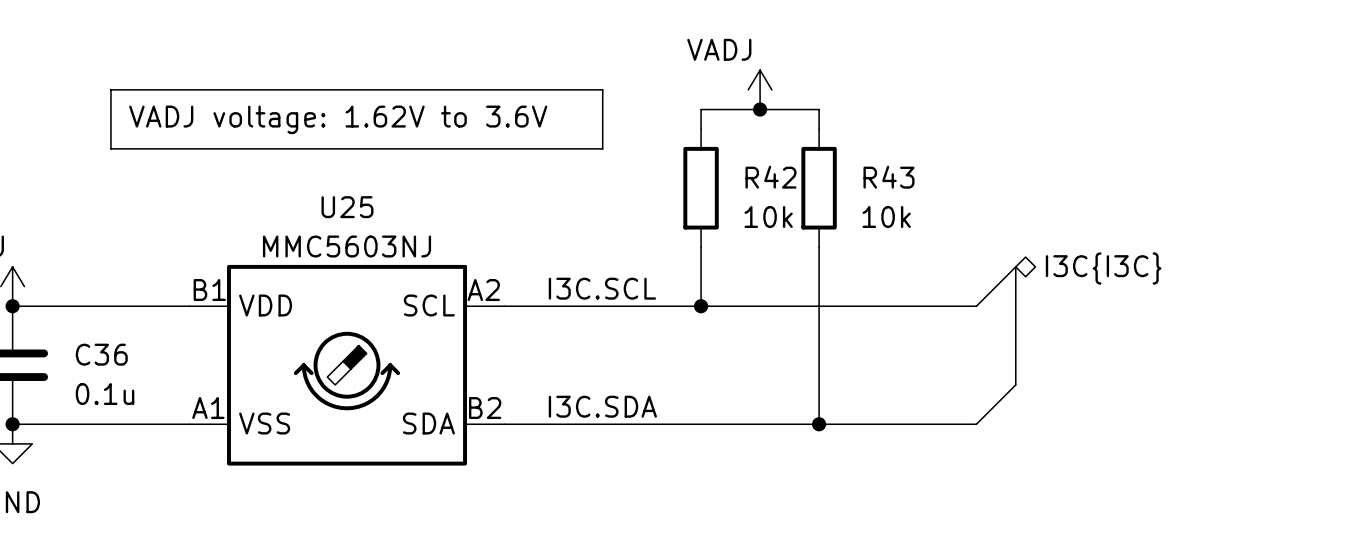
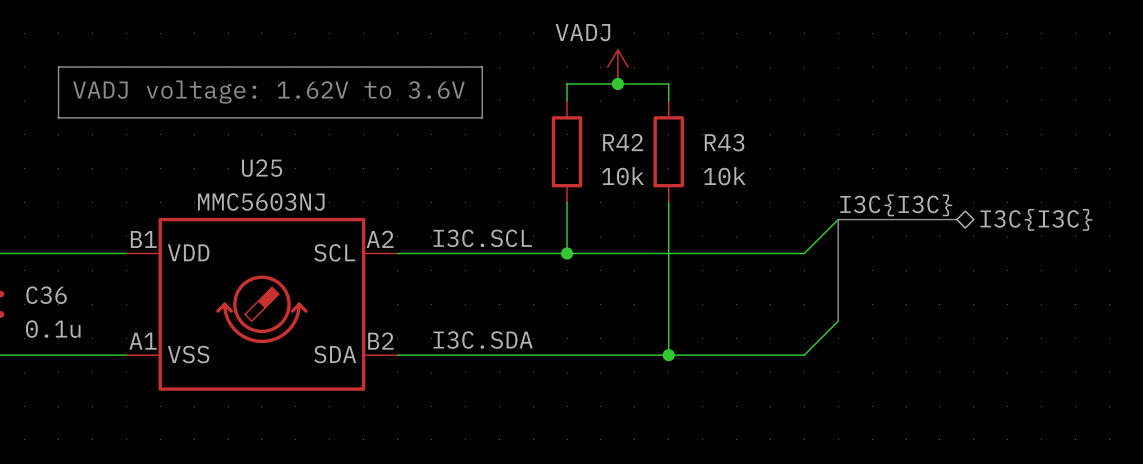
label: none -> I3C{I3C} (896, 205)
bus: none -> (838, 219) (956, 219)
hierarchical label position: I3C{I3C} (1103, 268) -> I3C{I3C} (1036, 219)

